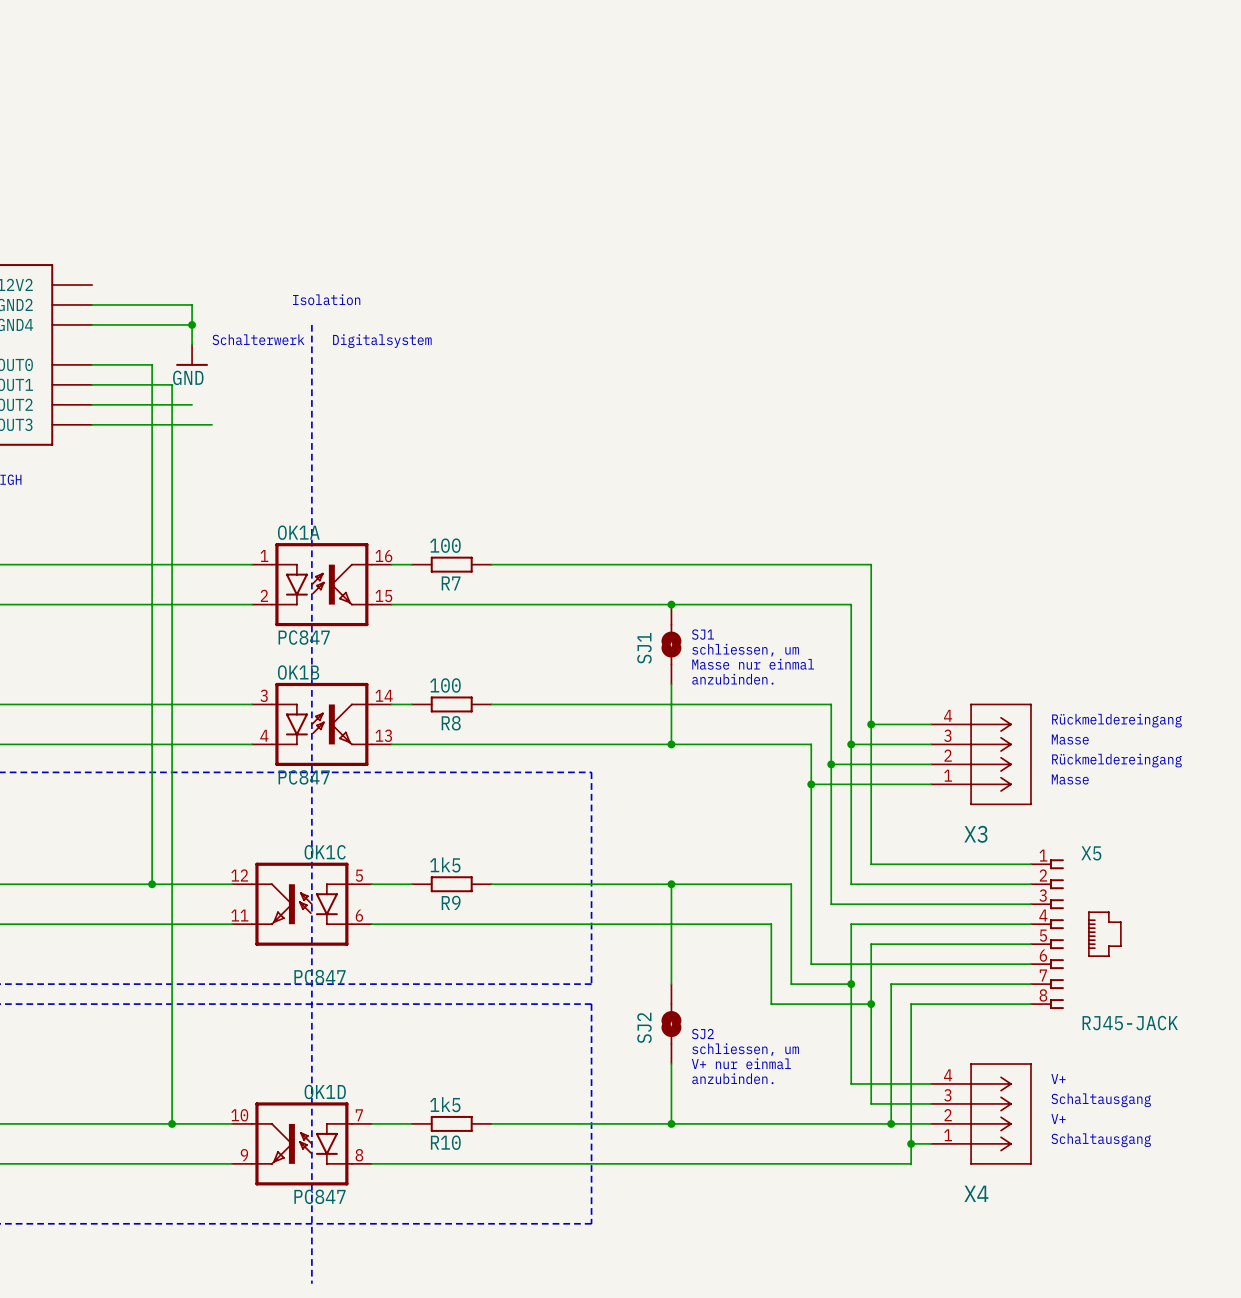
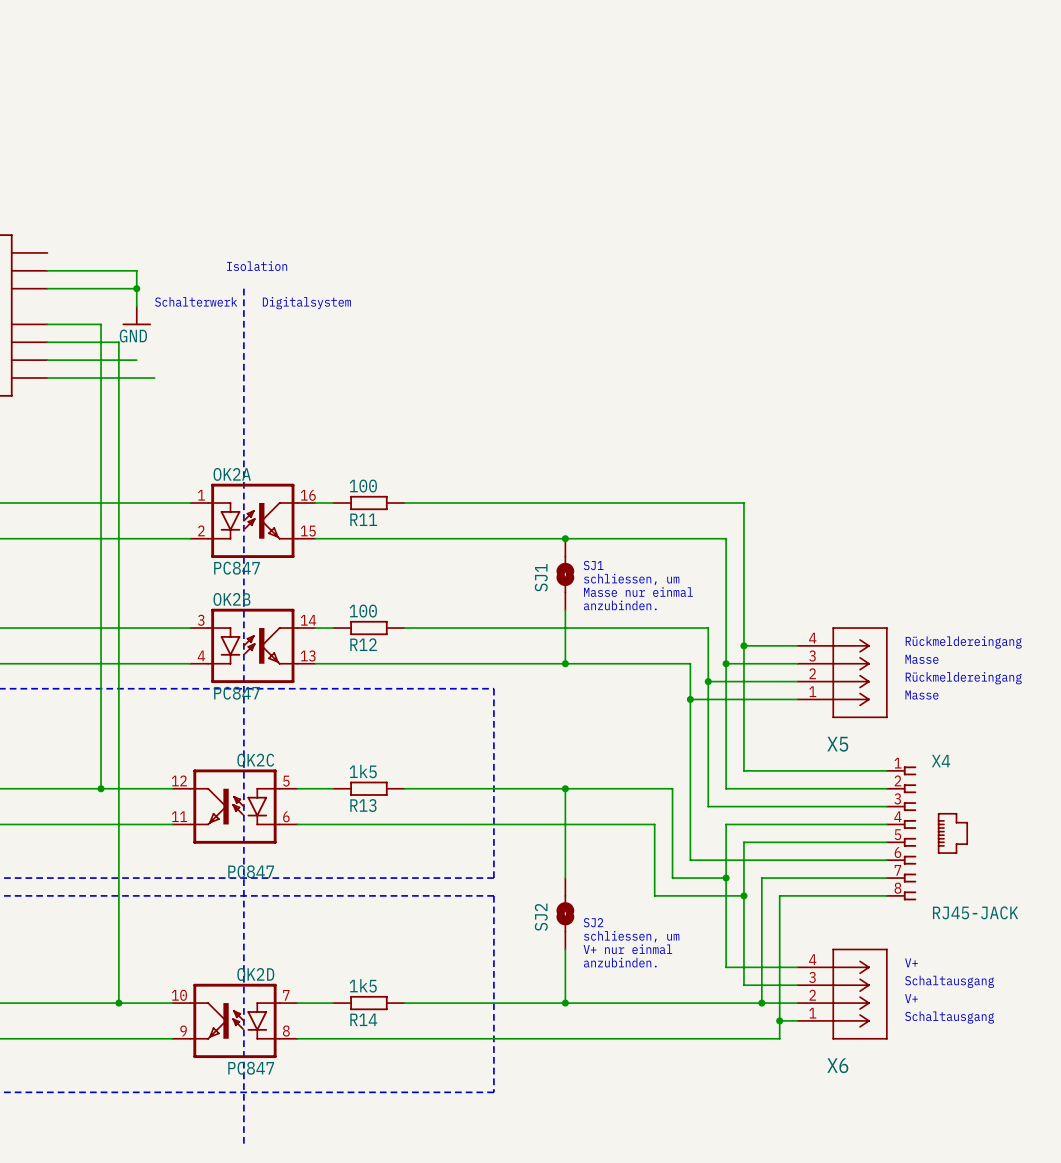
OK1A name: OK1A (298, 532) -> OK2A (232, 474)
R7 name: R7 (451, 583) -> R11 (363, 519)
OK1B name: OK1B (298, 672) -> OK2B (231, 599)
R8 name: R8 (451, 723) -> R12 (363, 644)
X3 name: X3 (975, 834) -> X5 (837, 744)
OK1C name: OK1C (325, 852) -> OK2C (255, 760)
X5 name: X5 (1091, 853) -> X4 (941, 761)
R9 name: R9 (451, 902) -> R13 (363, 805)
OK1D name: OK1D (325, 1091) -> OK2D (255, 974)
R10 name: R10 (445, 1142) -> R14 (363, 1019)
X4 name: X4 (976, 1193) -> X6 (837, 1065)

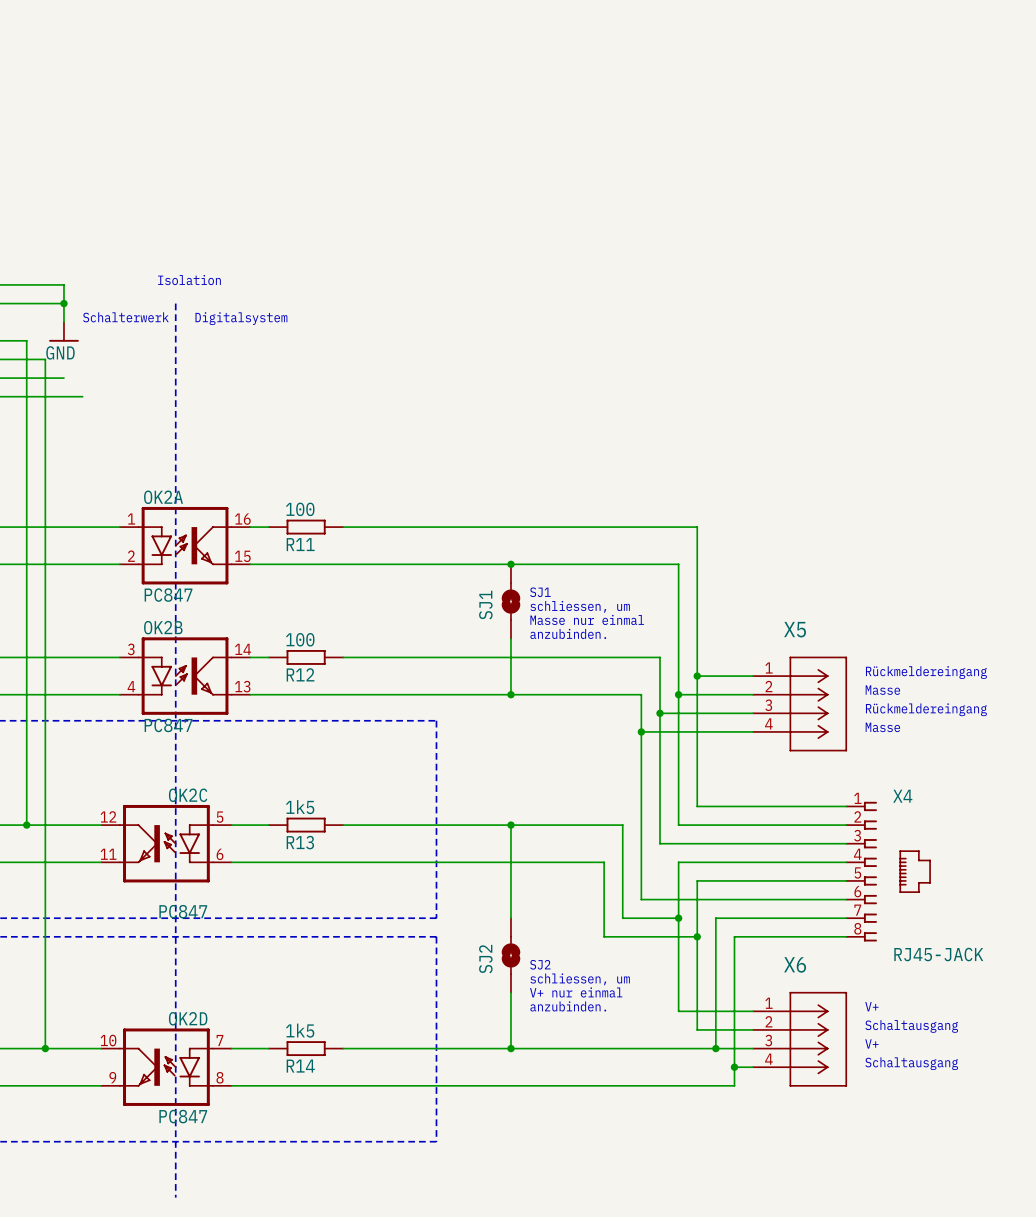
X5 flip: as is (860, 672) -> up-down (818, 704)
X6 flip: as is (860, 994) -> up-down (818, 1039)

